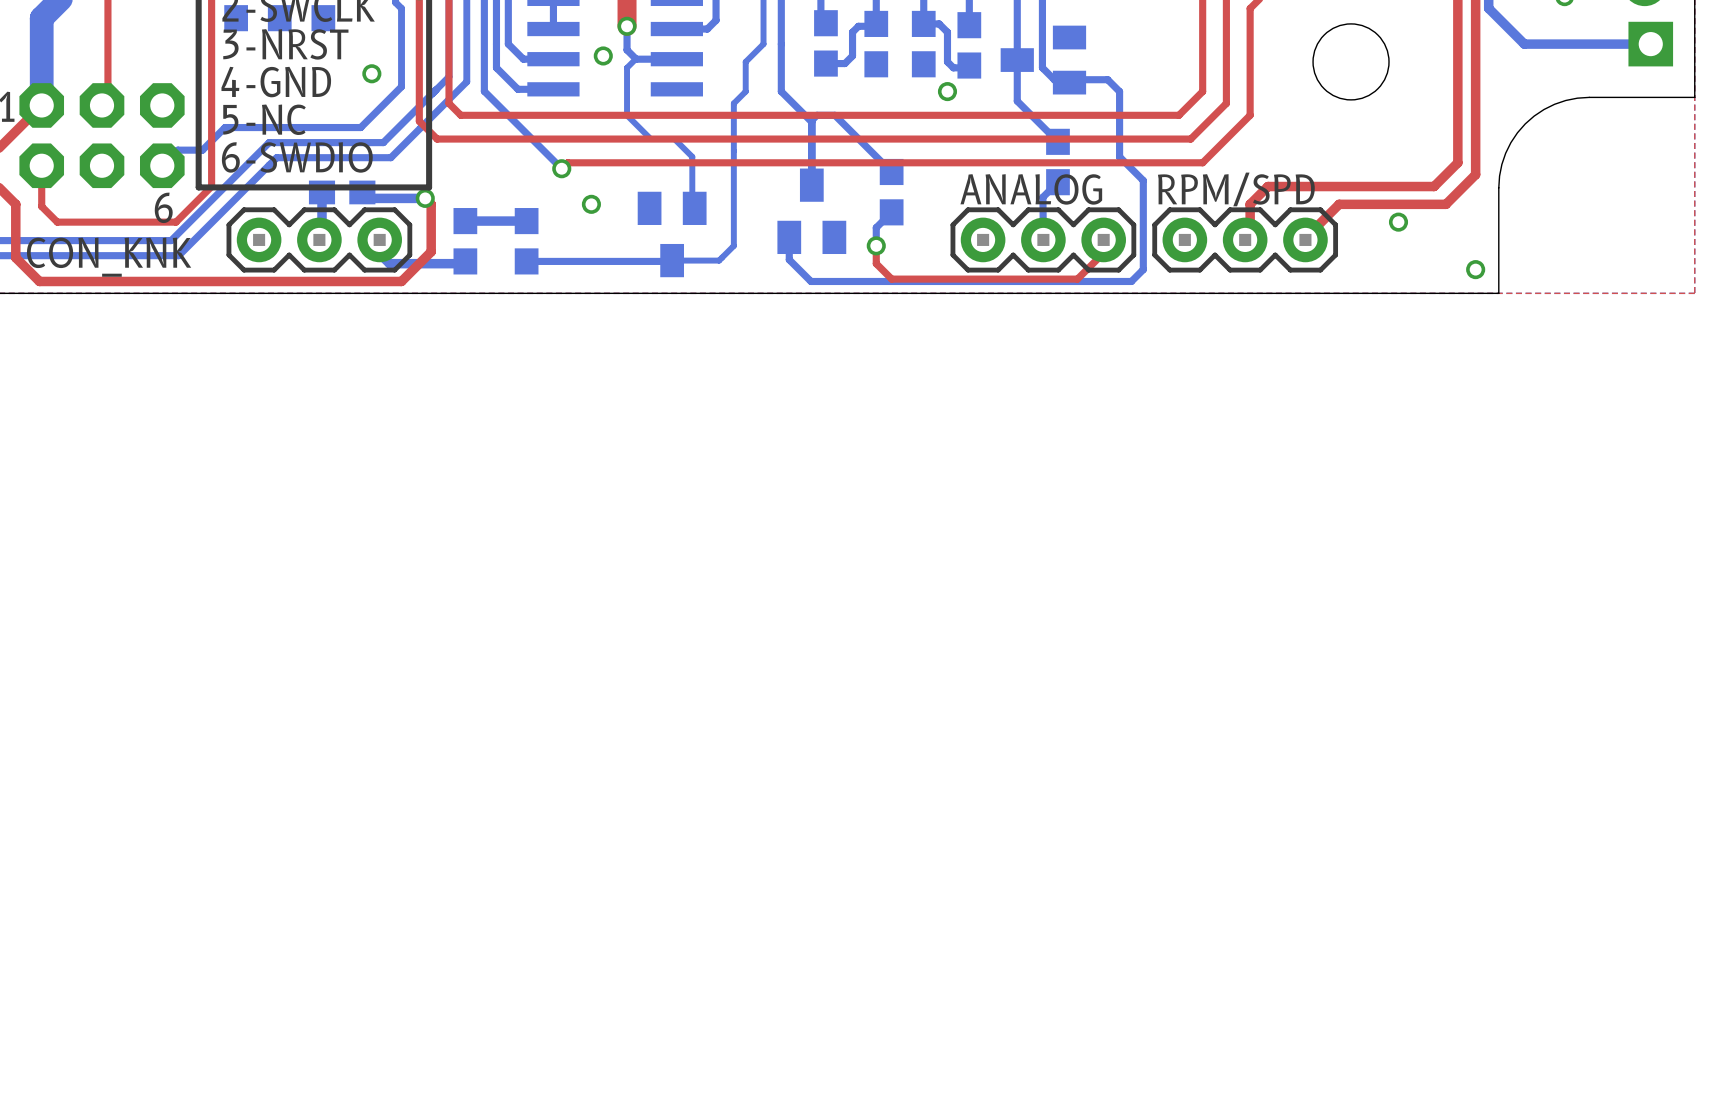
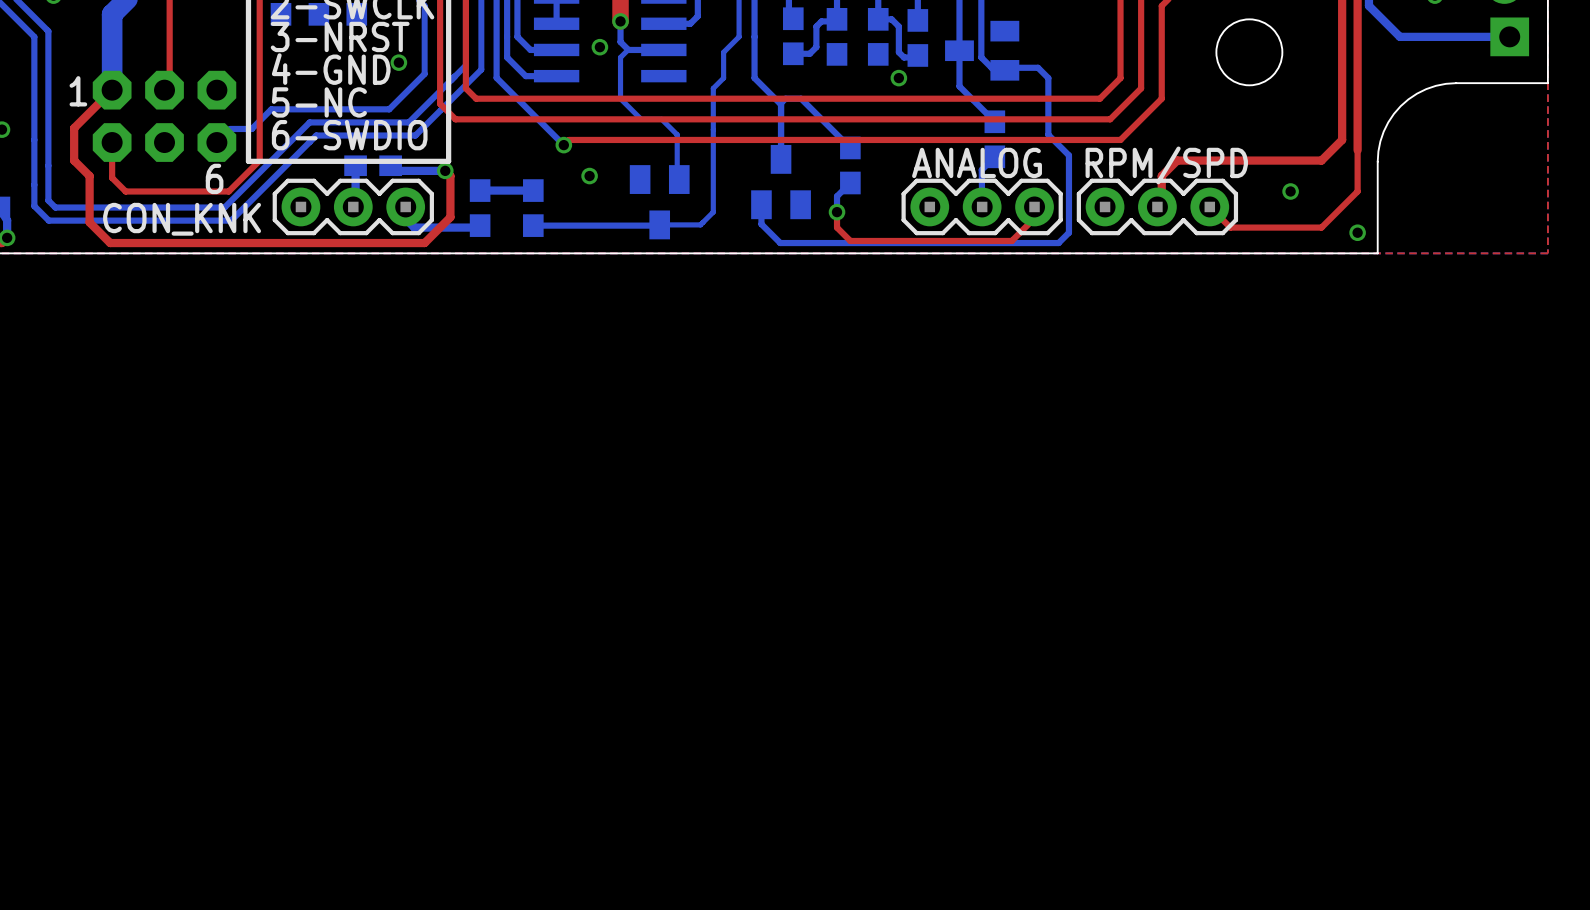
top track: (1475, 174) (1445, 204) (1339, 204) (1305, 239) -> (1357, 150) (1357, 191) (1321, 227) (1230, 227) (1209, 206)

